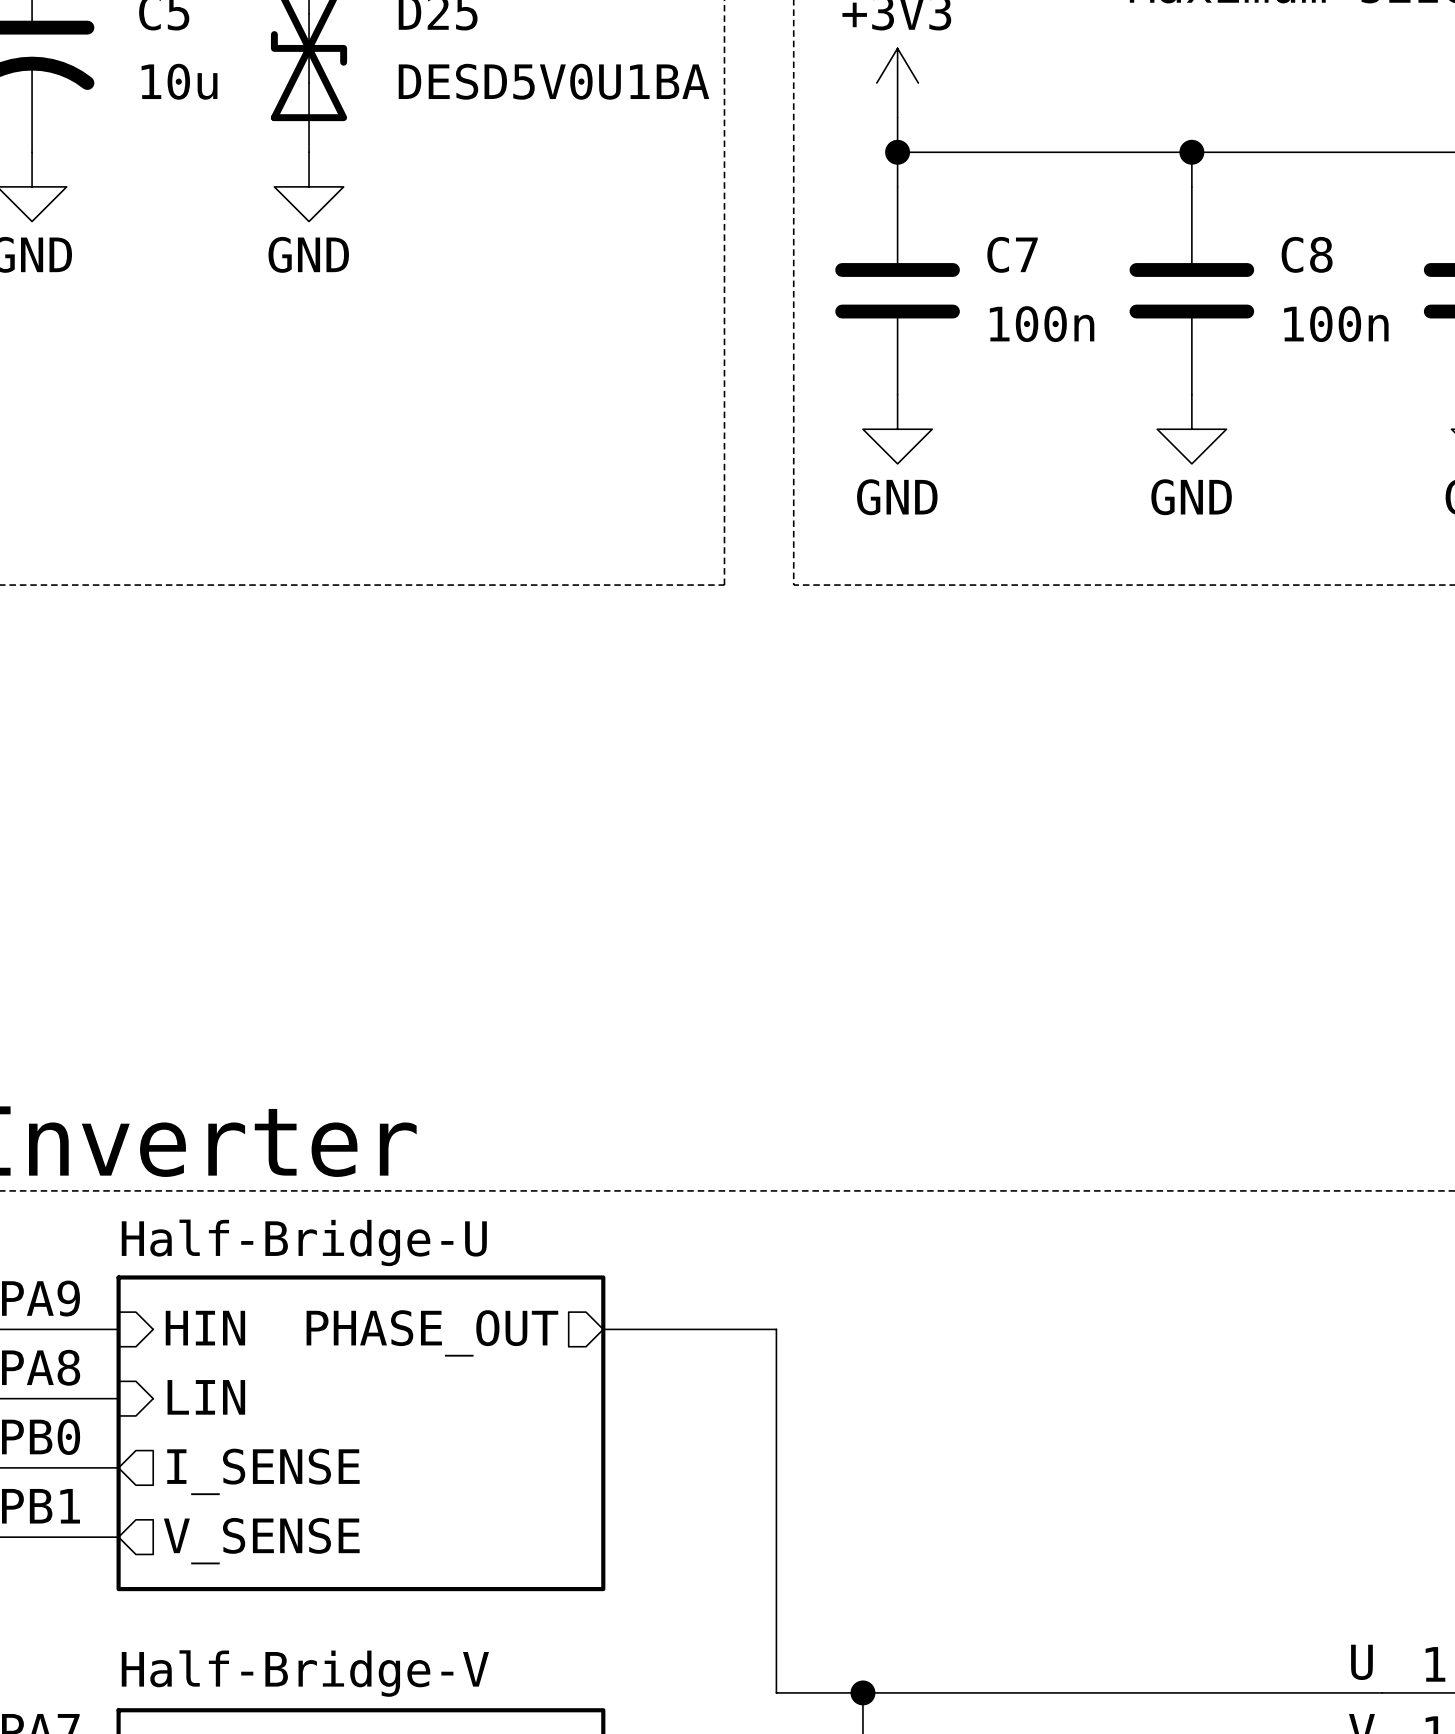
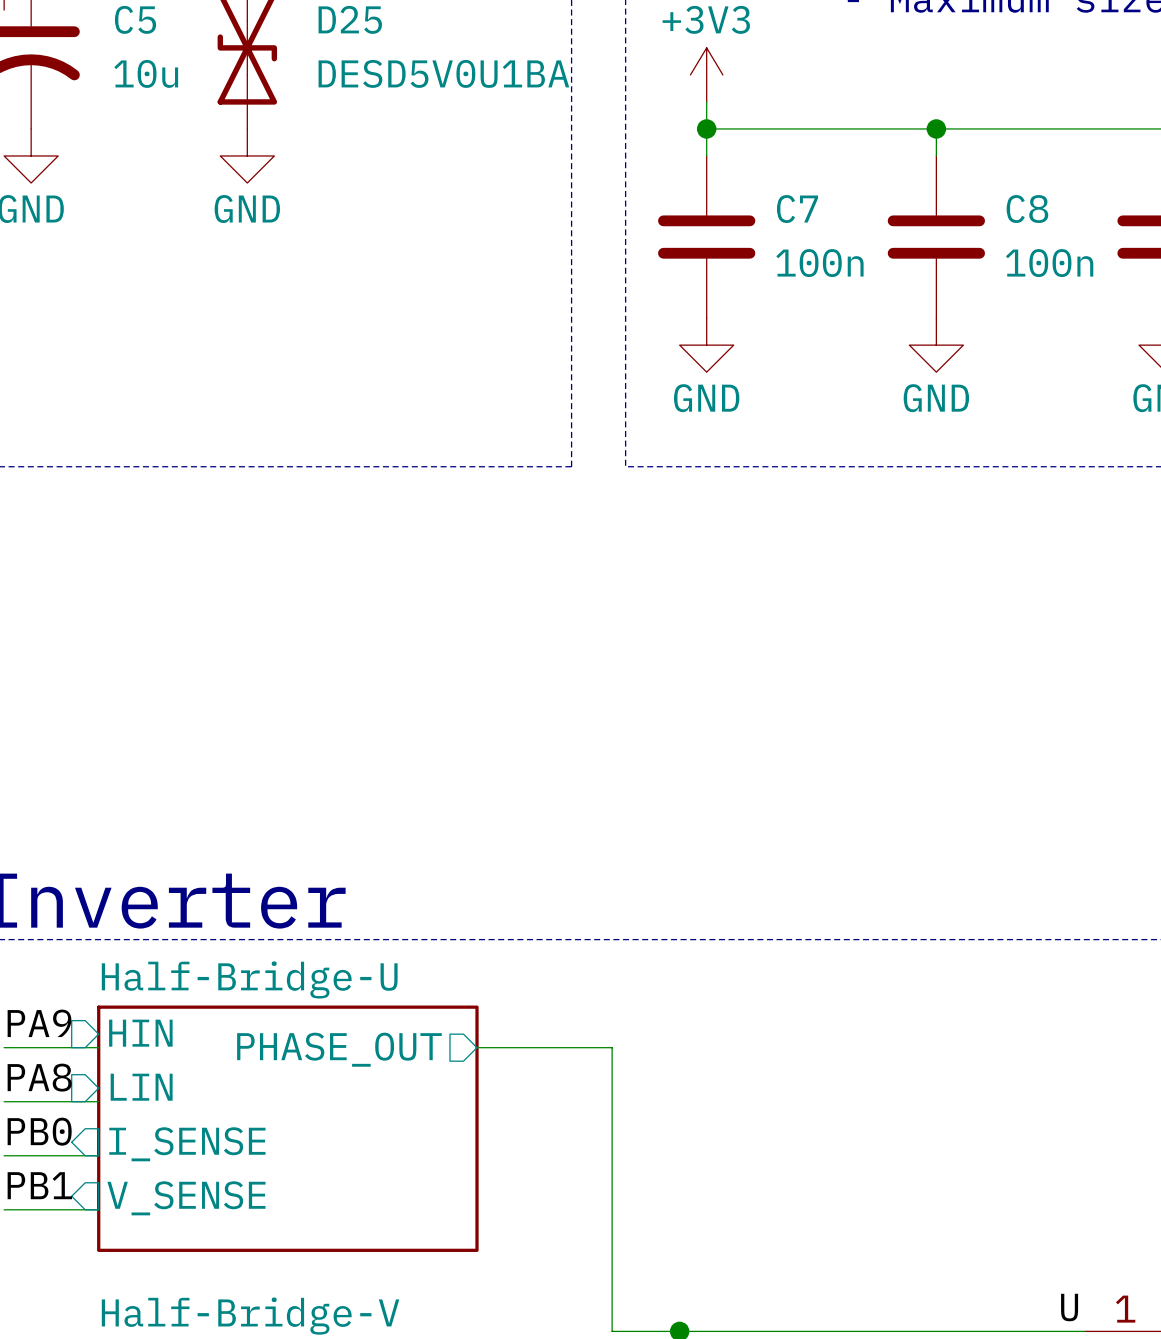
sheet pin position: HIN (205, 1328) -> HIN (140, 1033)
sheet pin position: LIN (206, 1397) -> LIN (141, 1087)
sheet pin position: I_SENSE (263, 1471) -> I_SENSE (187, 1144)
sheet pin position: V_SENSE (261, 1541) -> V_SENSE (186, 1198)

